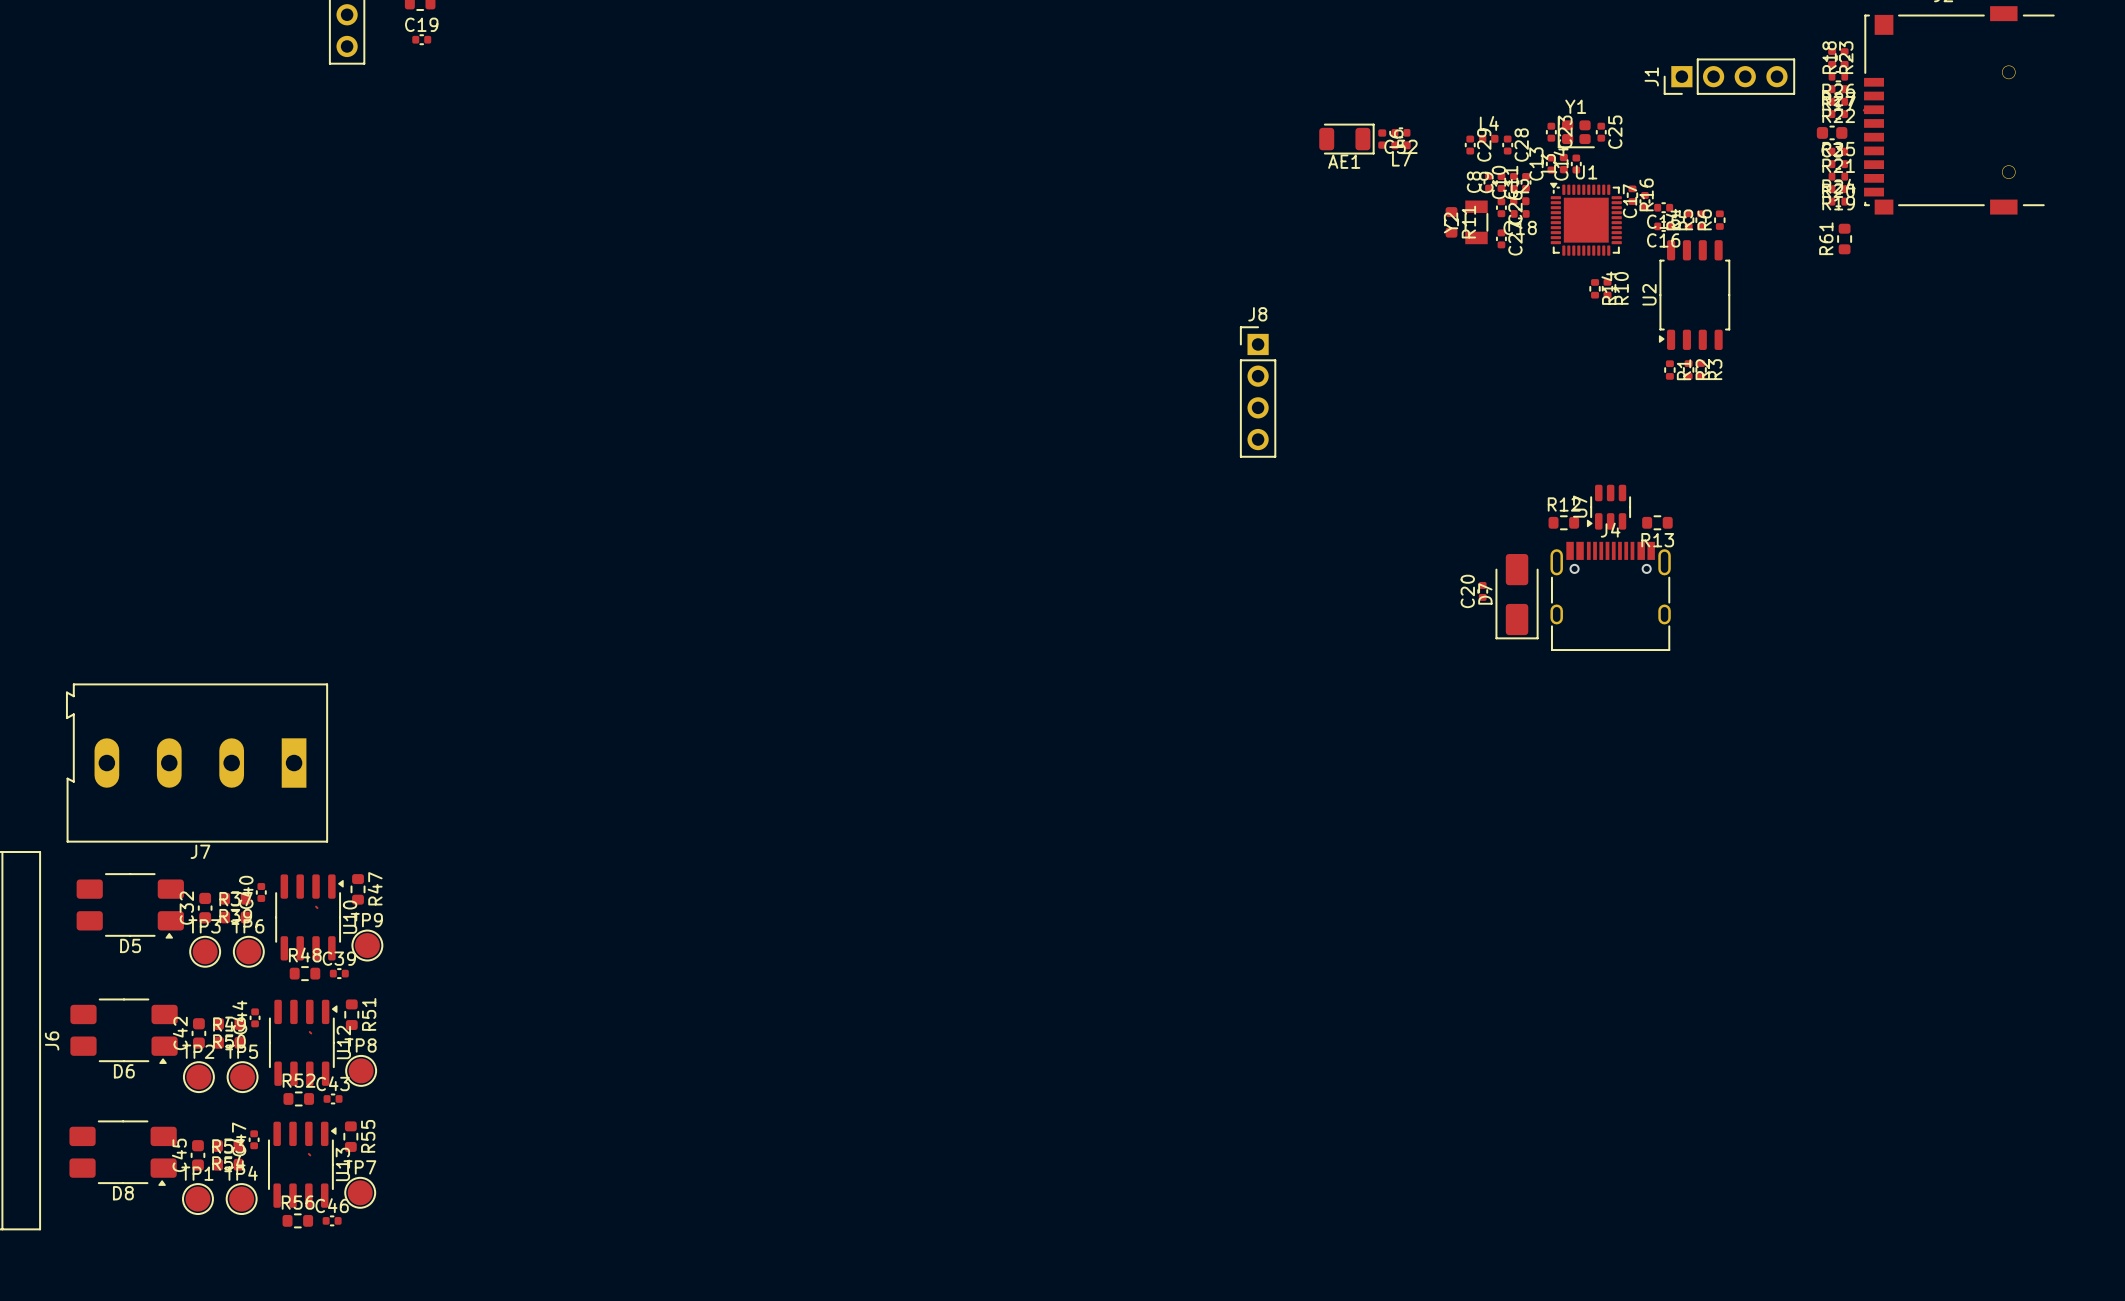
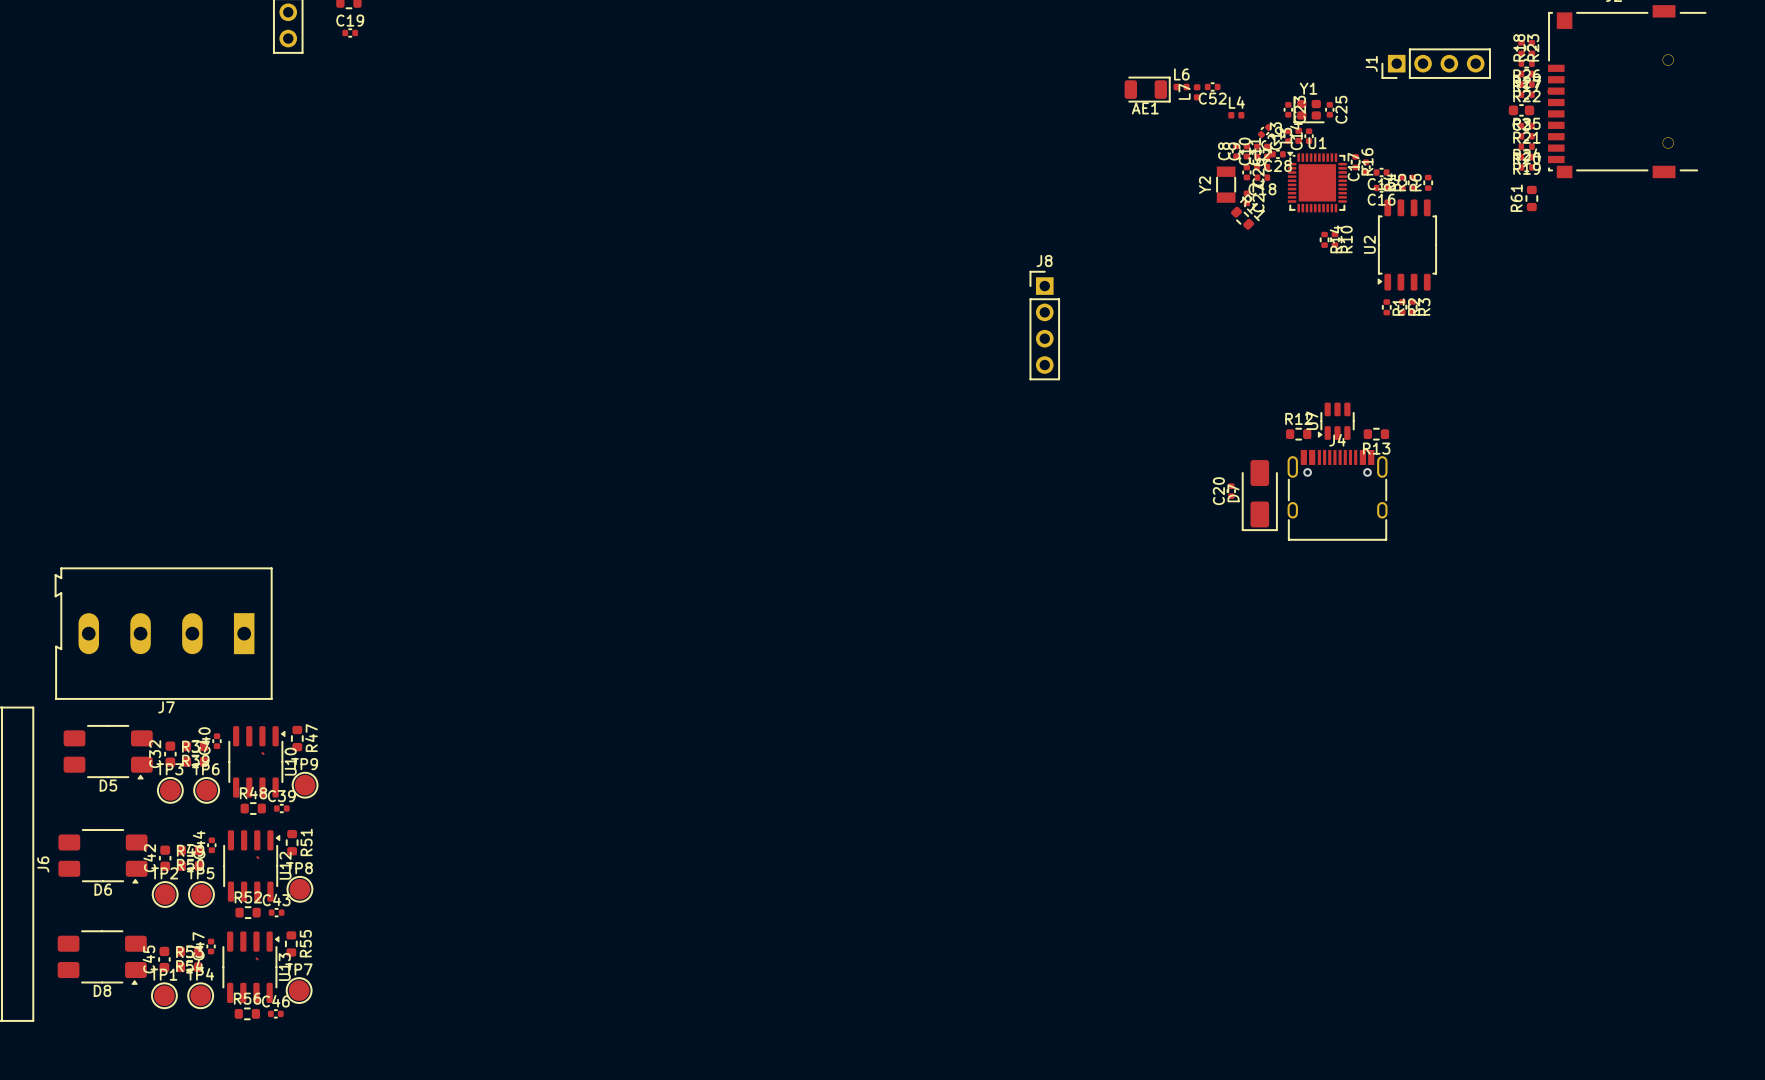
C52 position: (1400, 132) -> (1212, 86)
AE1 position: (1346, 139) -> (1147, 89)
L6 rotation: 0° (1382, 139) -> 90° clockwise (1181, 86)
L6 position: (1382, 139) -> (1181, 86)
L7 rotation: 0° (1400, 145) -> 90° clockwise (1197, 92)
L7 position: (1400, 145) -> (1197, 92)
C29 rotation: 0° (1470, 145) -> 45° clockwise (1264, 131)
C29 position: (1470, 145) -> (1264, 131)
C28 rotation: 0° (1507, 145) -> 90° clockwise (1277, 154)
C28 position: (1507, 145) -> (1277, 154)
R11 rotation: 0° (1451, 222) -> 45° counterclockwise (1242, 218)
R11 position: (1451, 222) -> (1242, 218)

